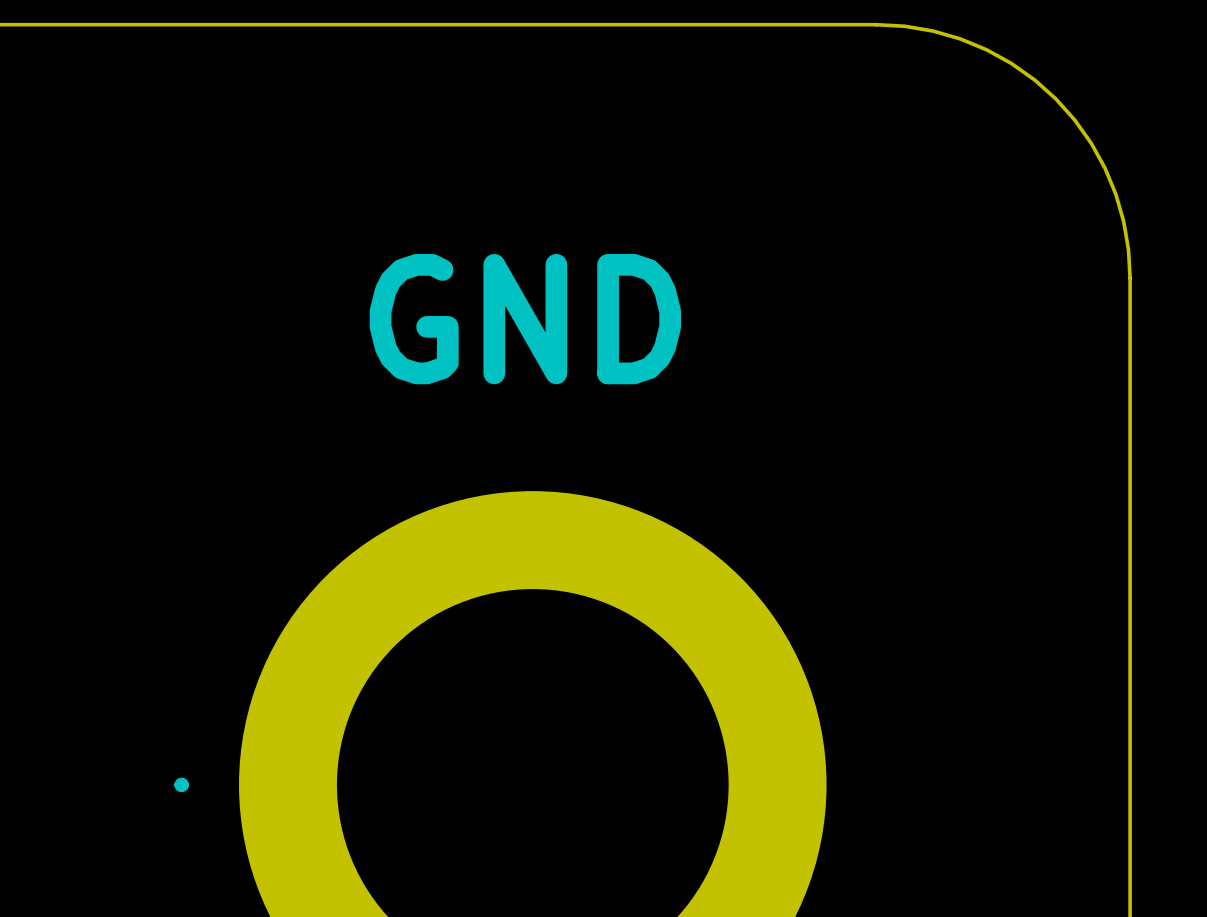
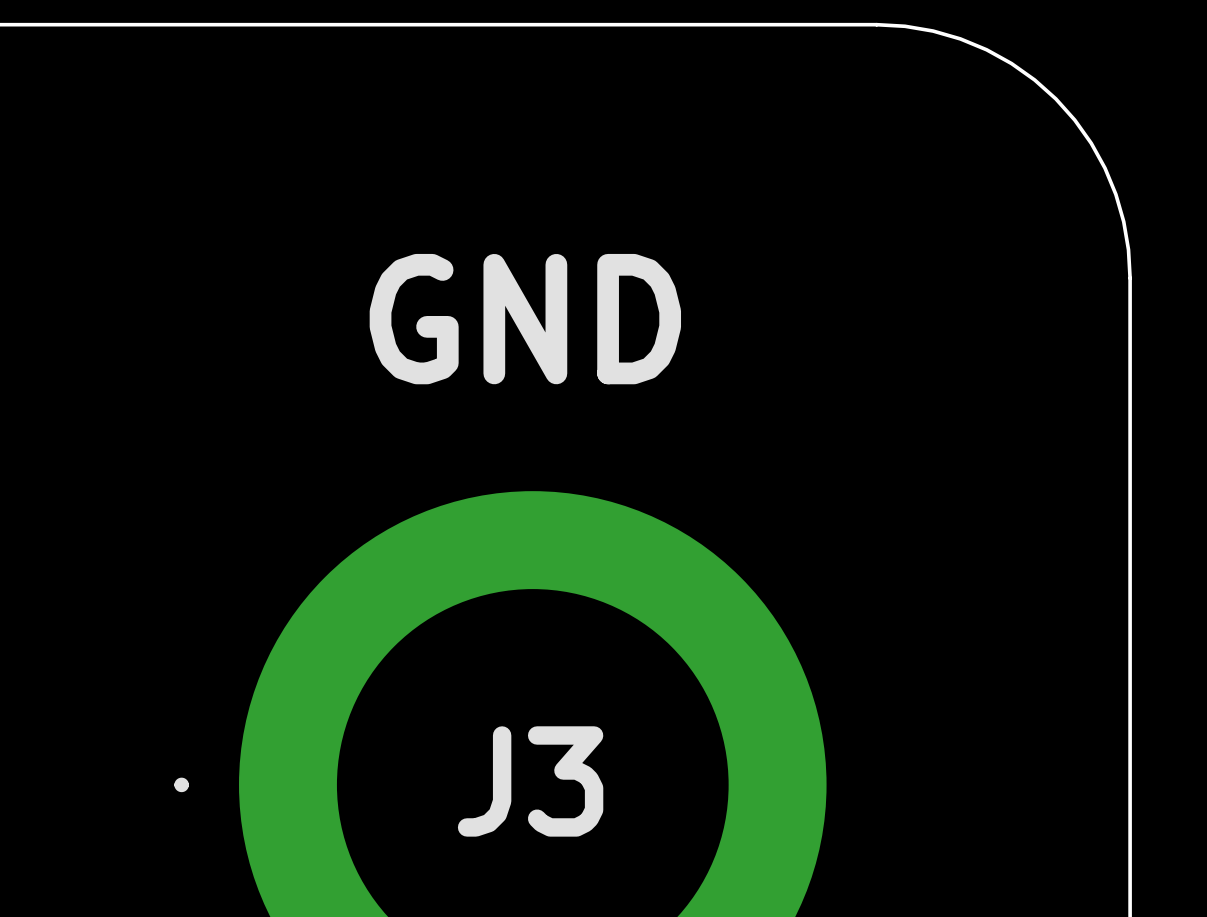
J3 name: none -> J3 (530, 781)

